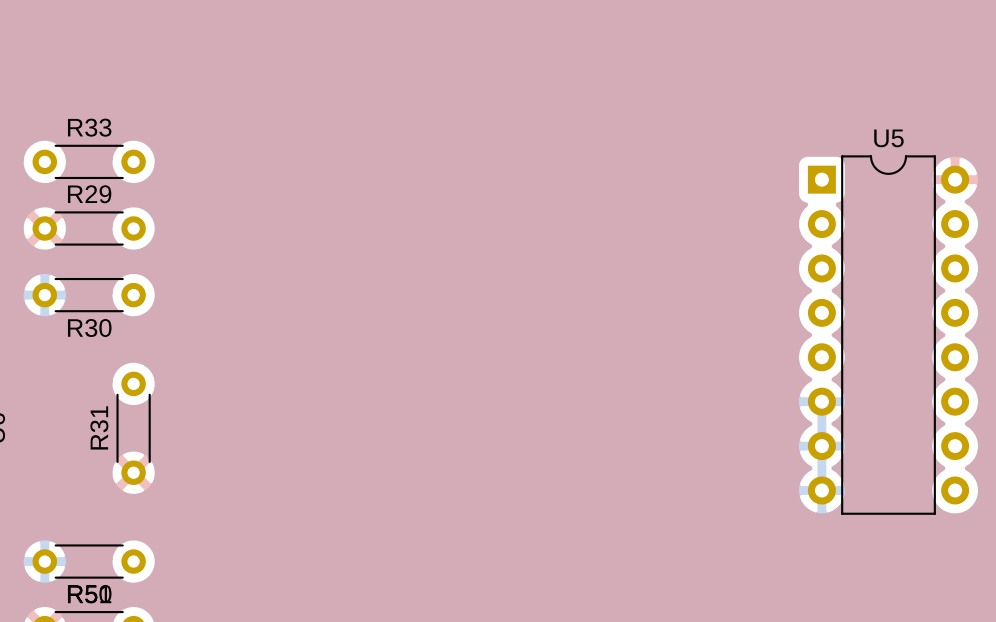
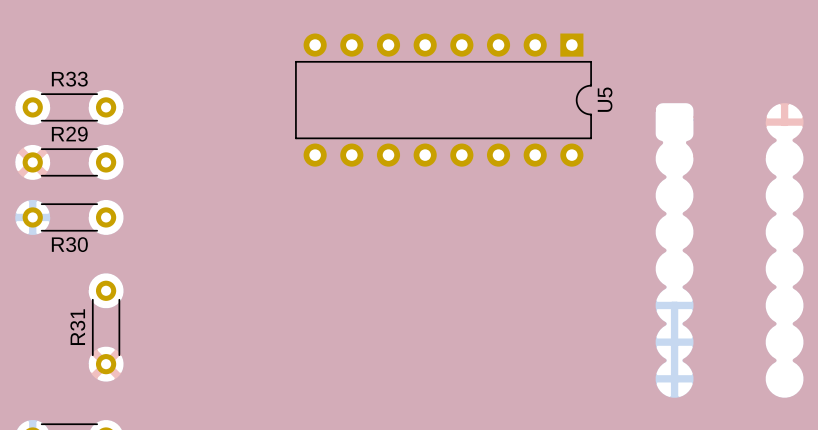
U5 rotation: 0° (888, 335) -> 90° clockwise (443, 100)
U5 position: (888, 335) -> (443, 100)

